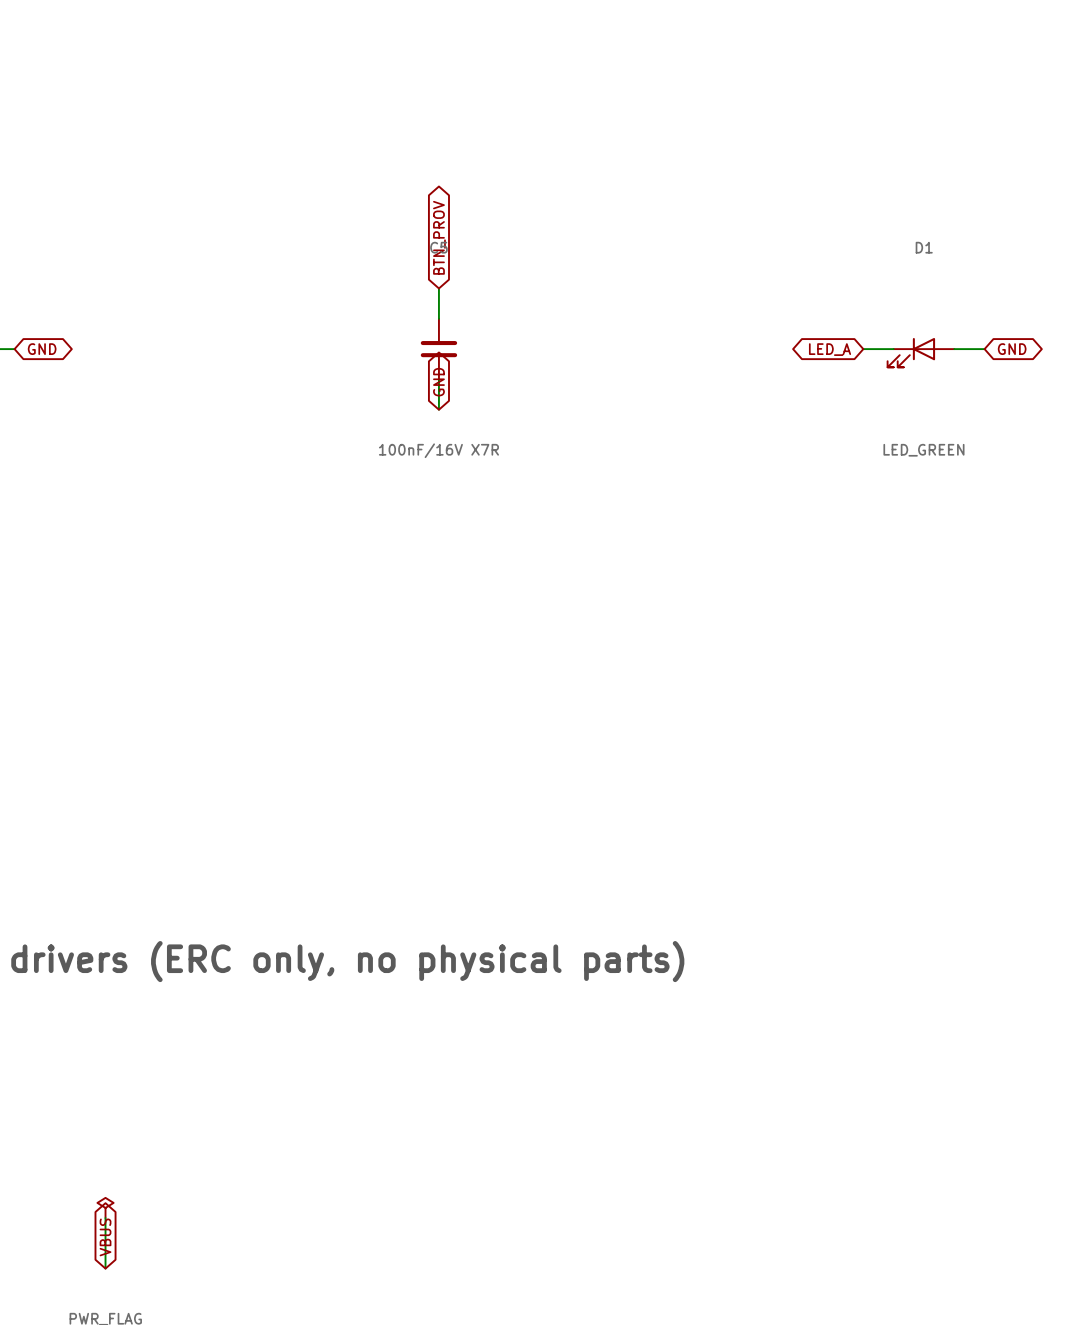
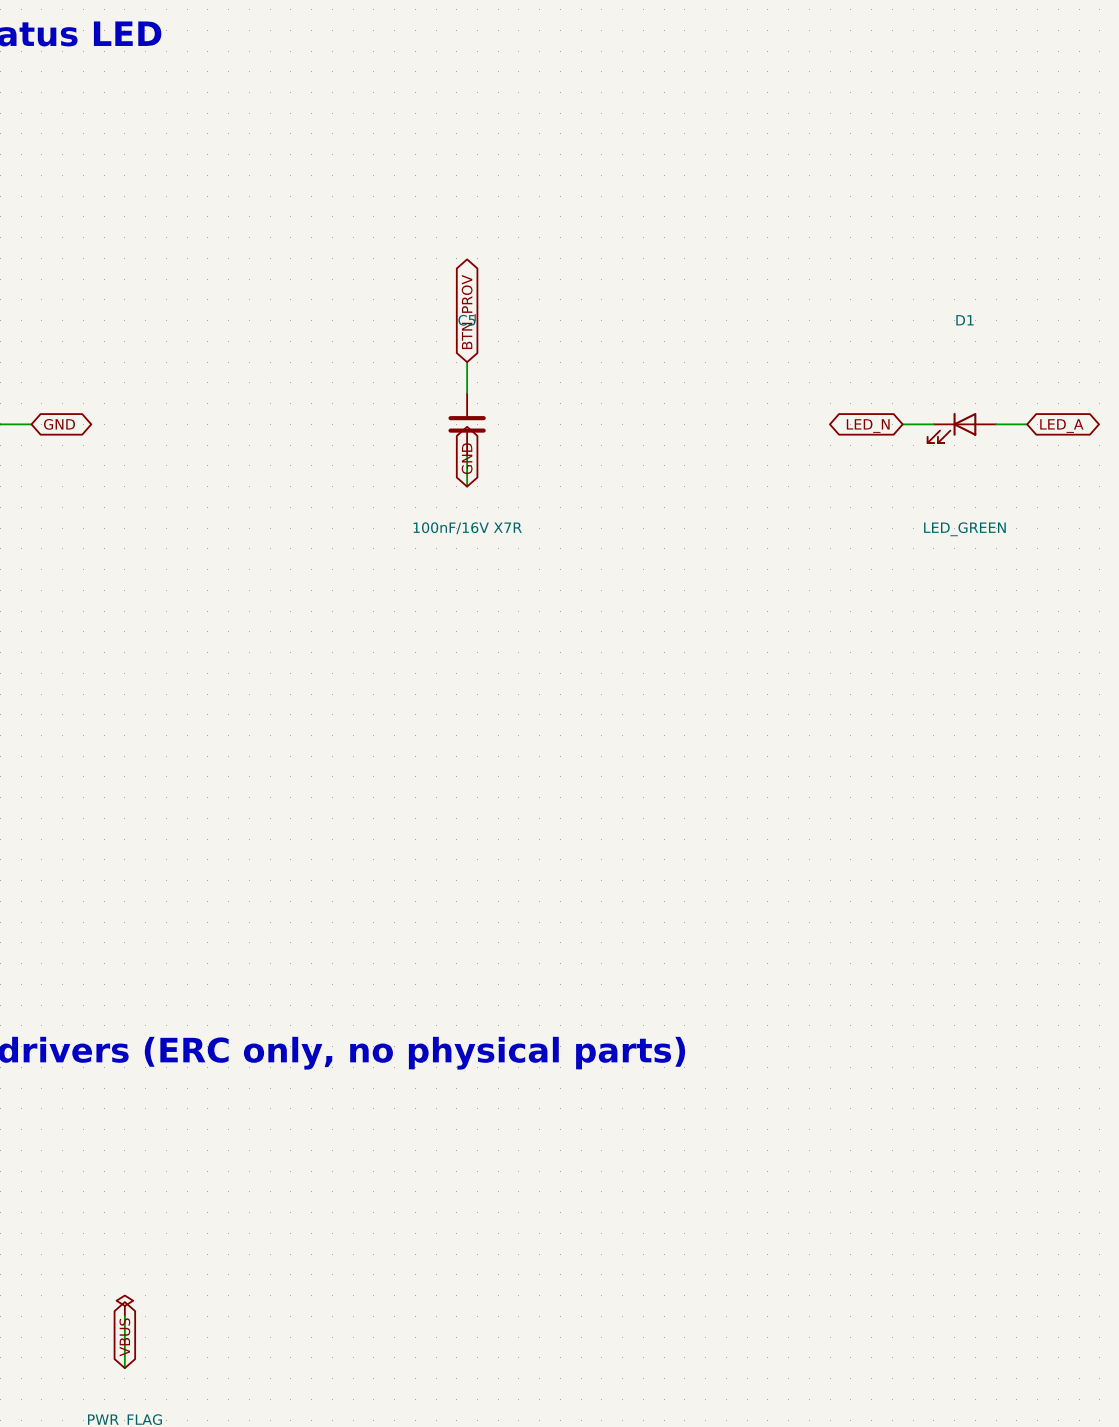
global label: LED_A (830, 349) -> LED_N (868, 426)
global label: GND (1012, 349) -> LED_A (1061, 426)

